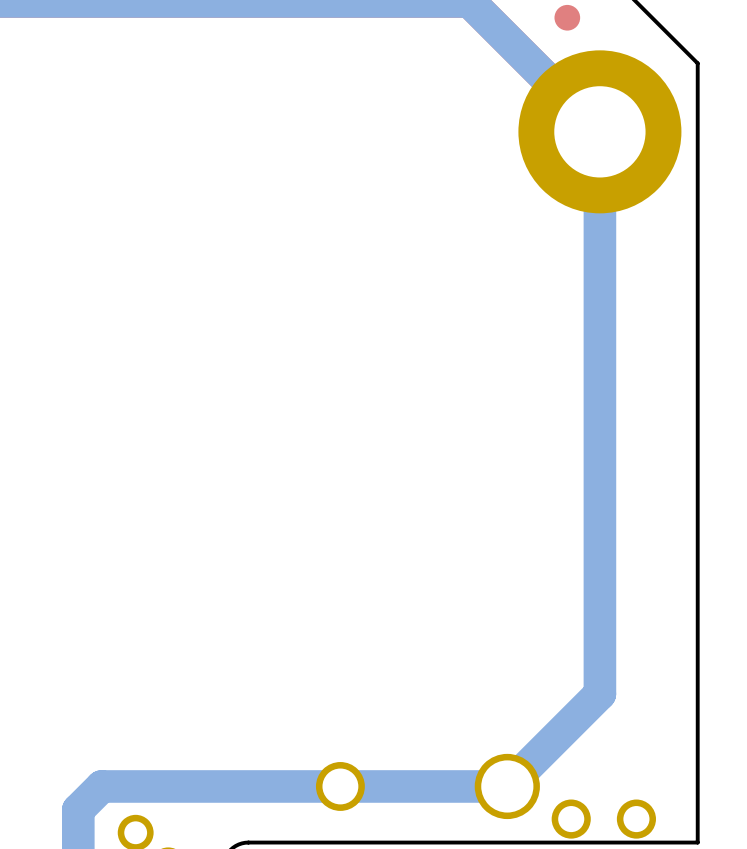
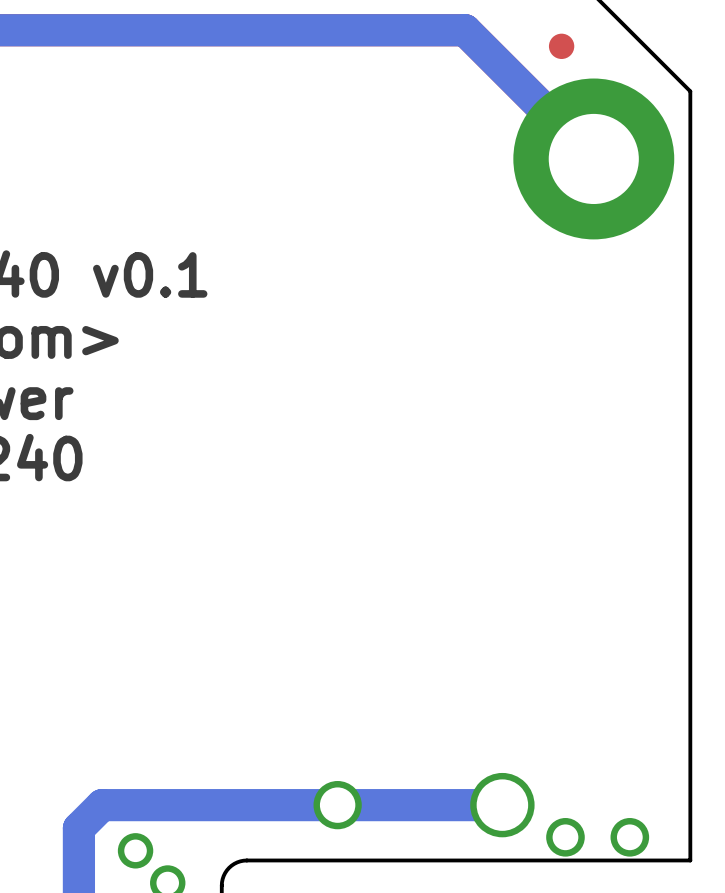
bottom track: (599, 131) (599, 693) (507, 786) -> none

